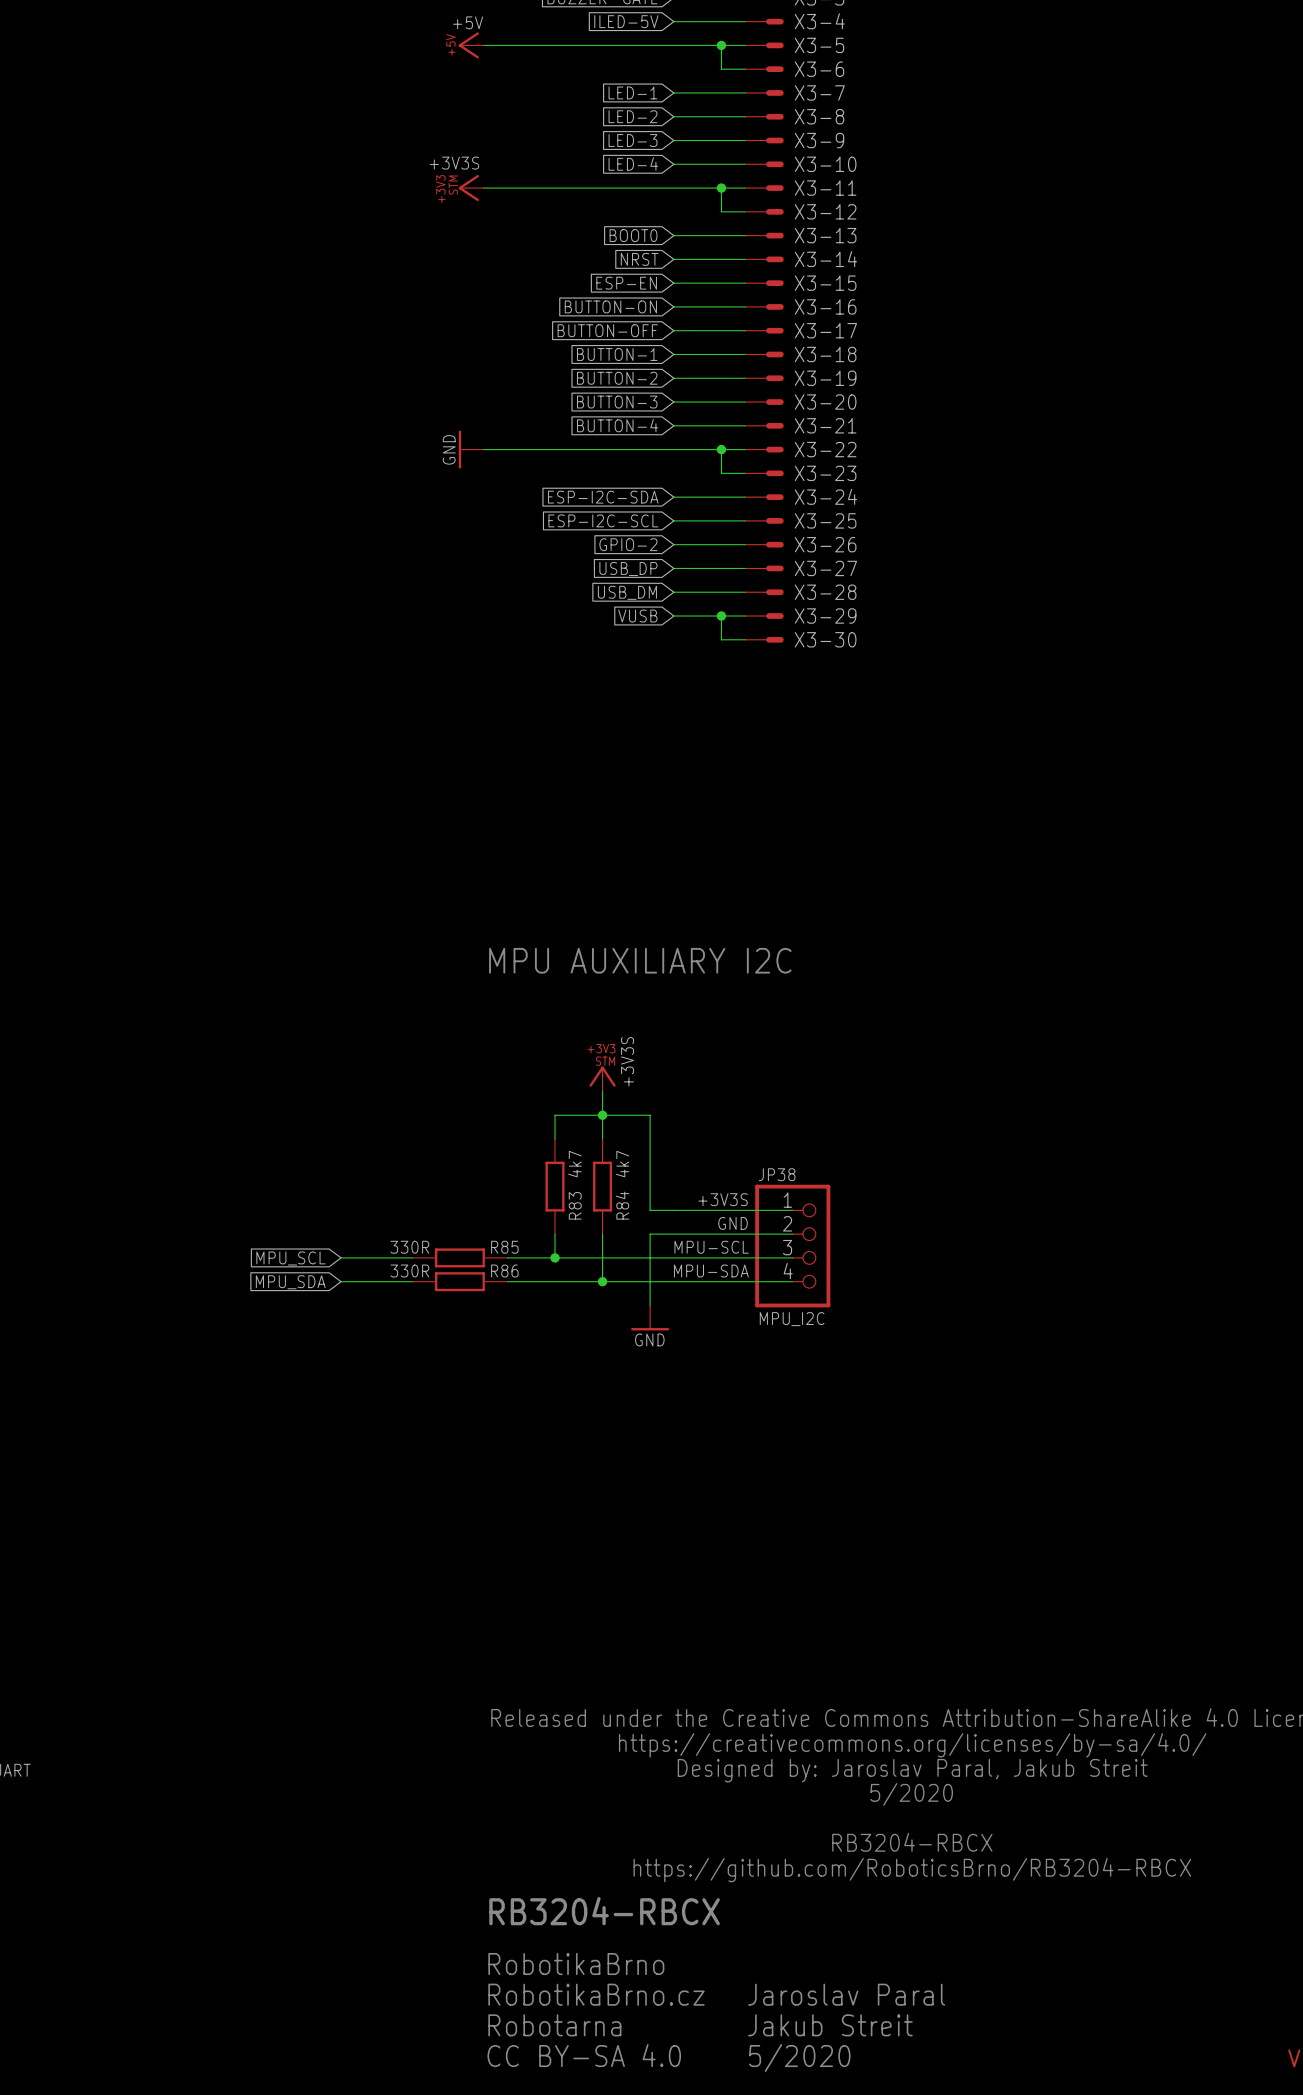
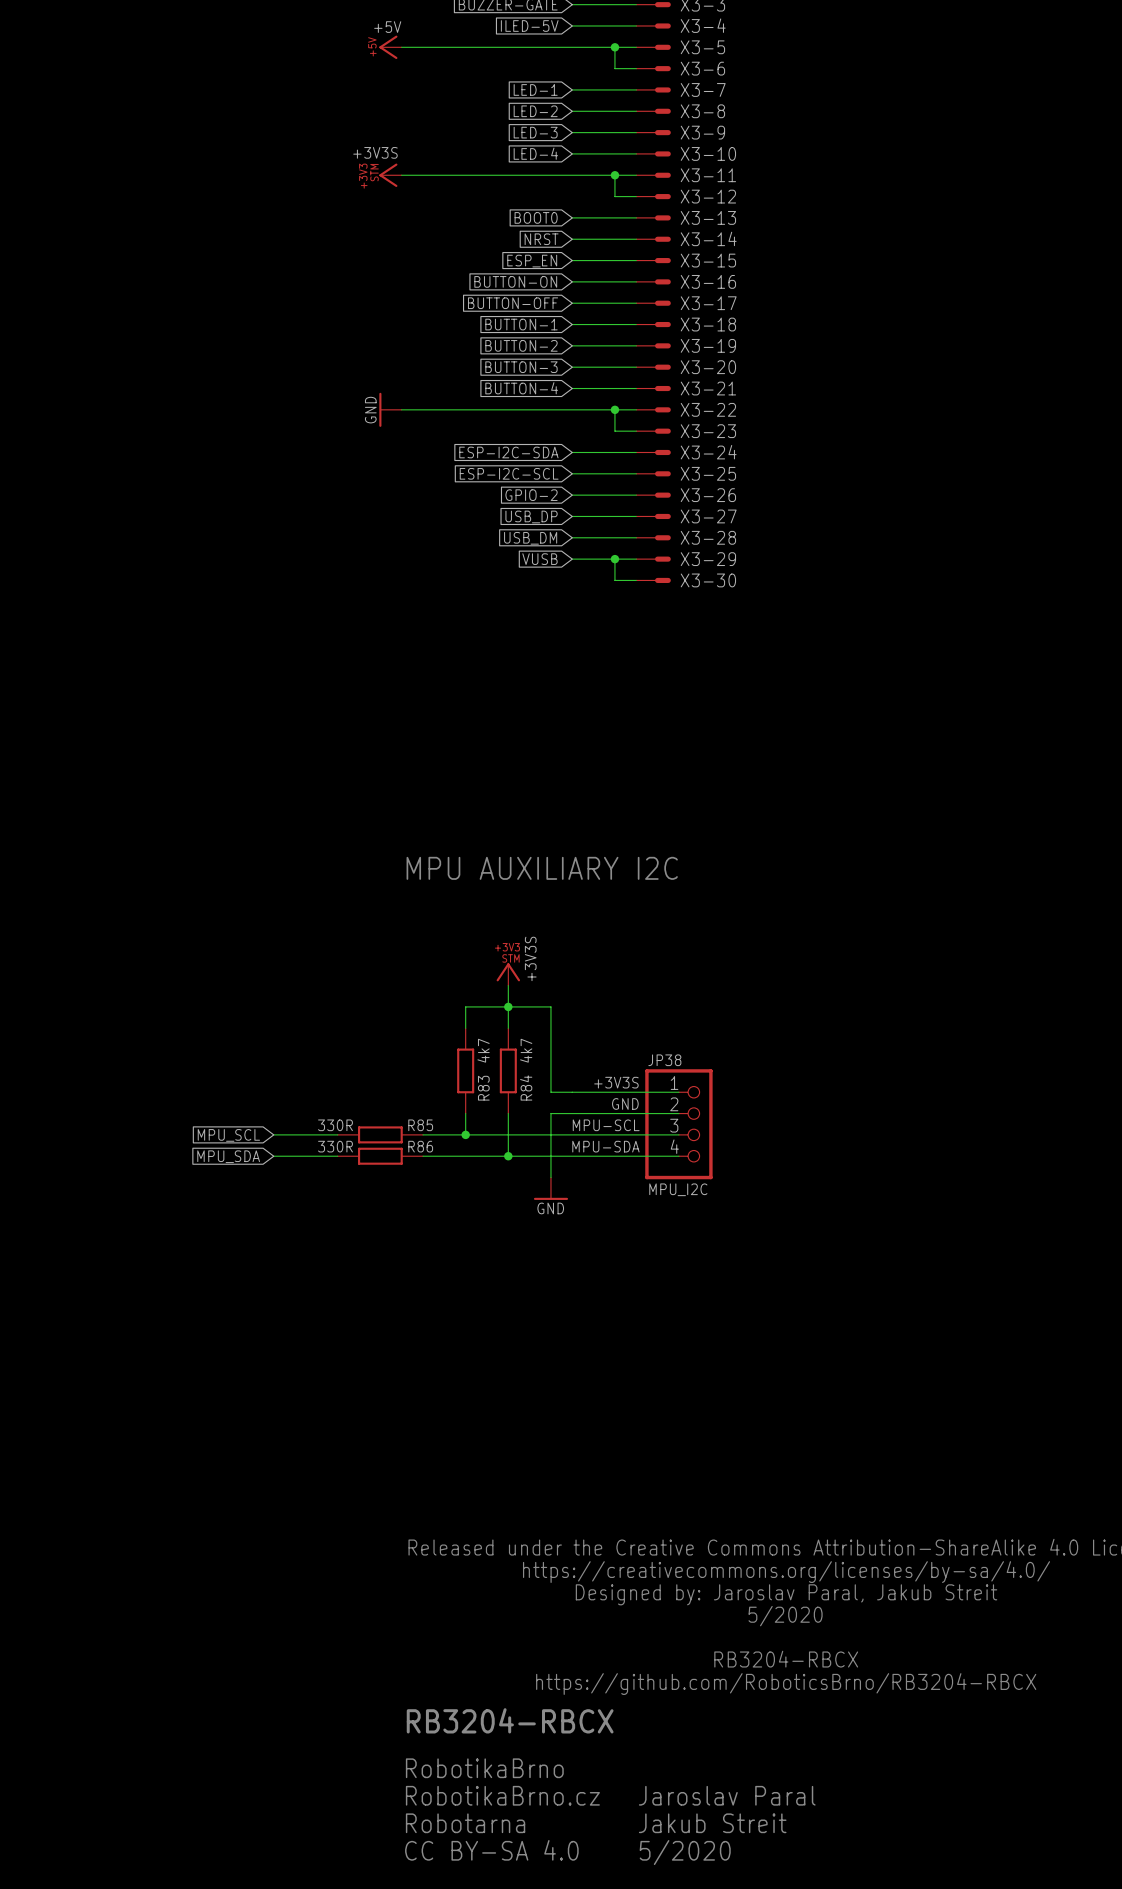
global label: ESP-EN (626, 283) -> ESP_EN (532, 261)

